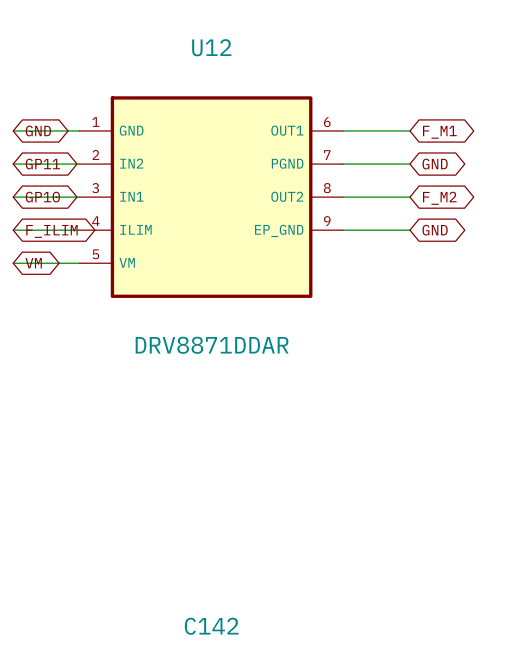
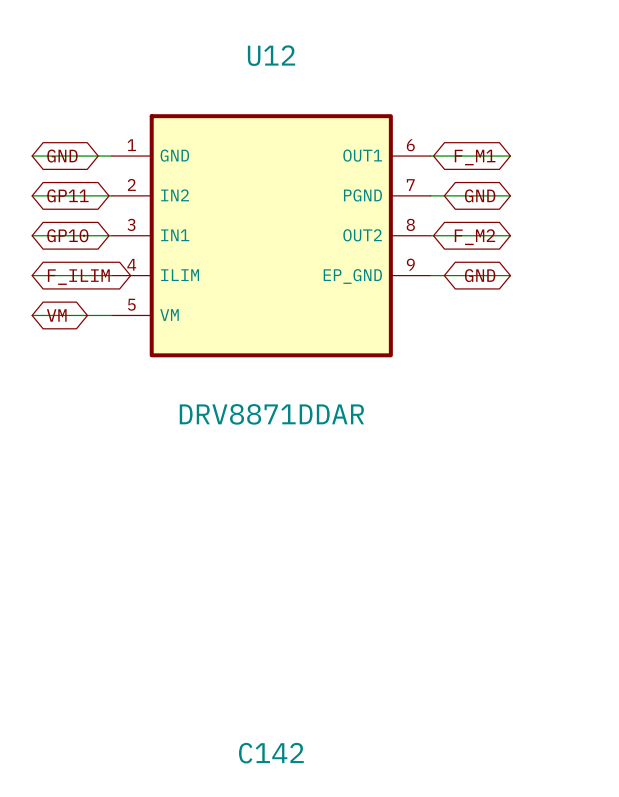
global label rotation: 0° (439, 132) -> 180° (475, 157)
global label rotation: 0° (435, 164) -> 180° (480, 195)
global label rotation: 0° (439, 198) -> 180° (474, 237)
global label rotation: 0° (435, 230) -> 180° (480, 275)

